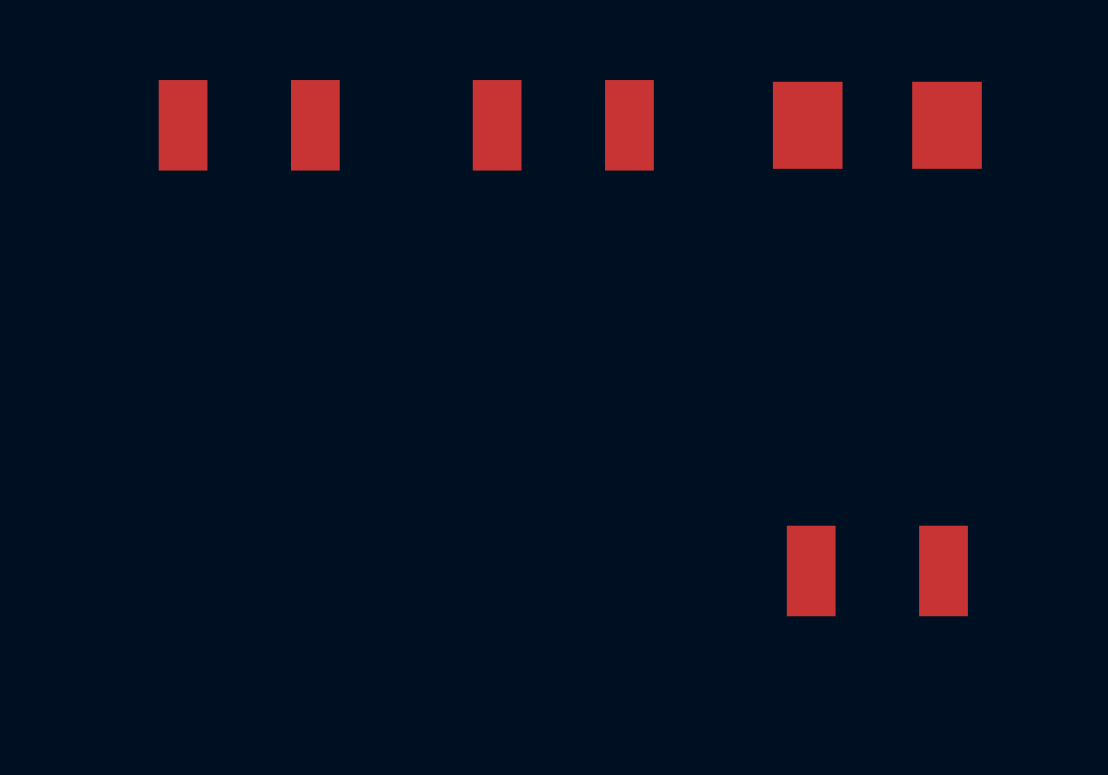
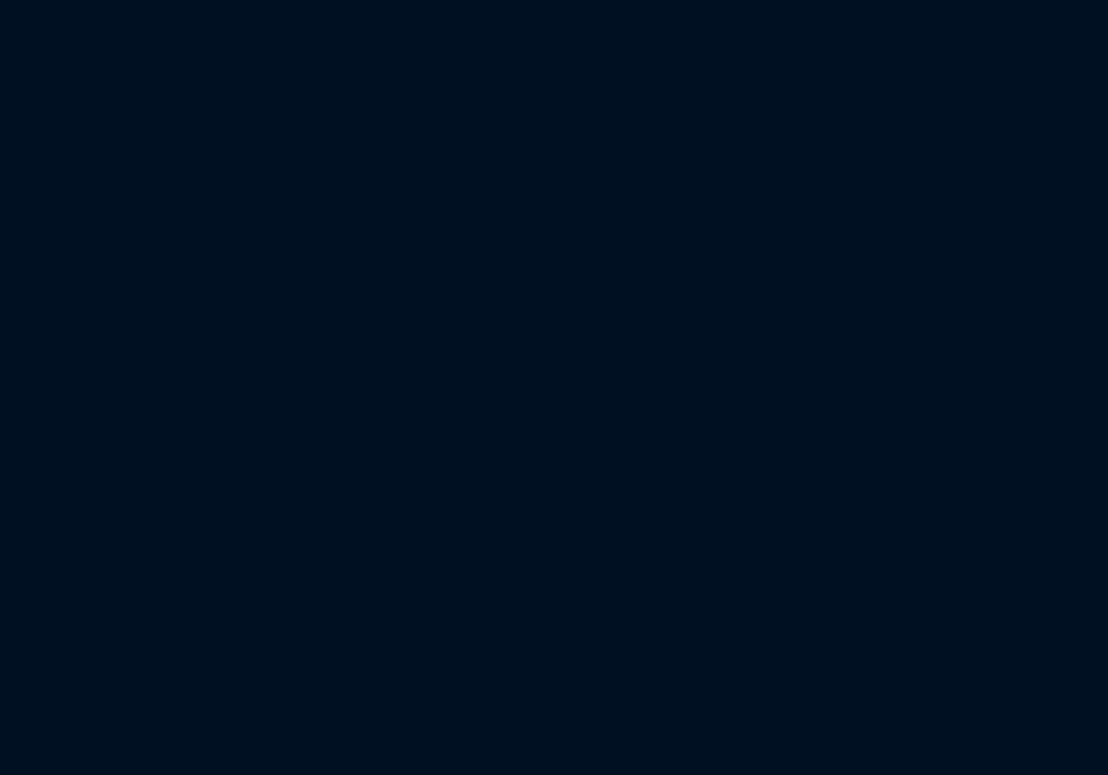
part: (249, 125) -> none
part: (563, 125) -> none
part: (877, 125) -> none
part: (877, 570) -> none

